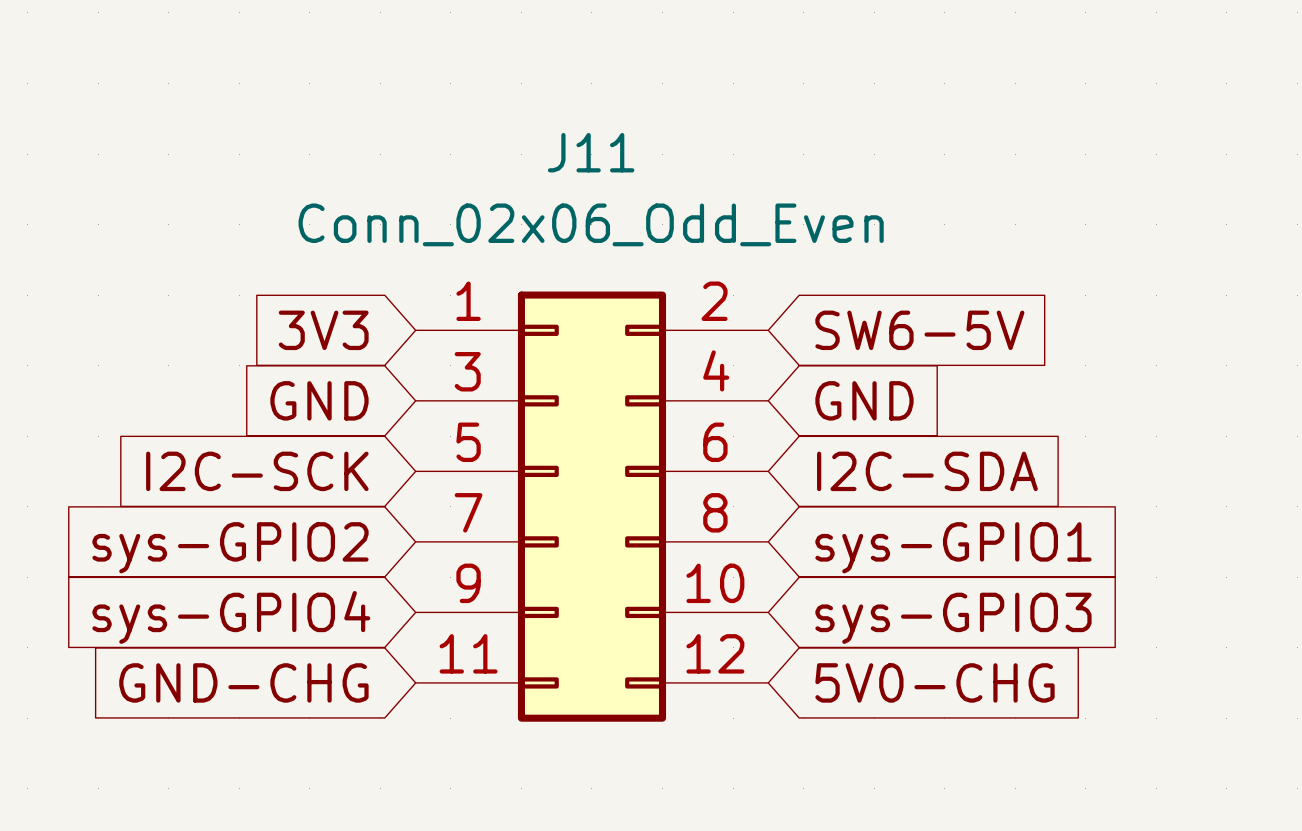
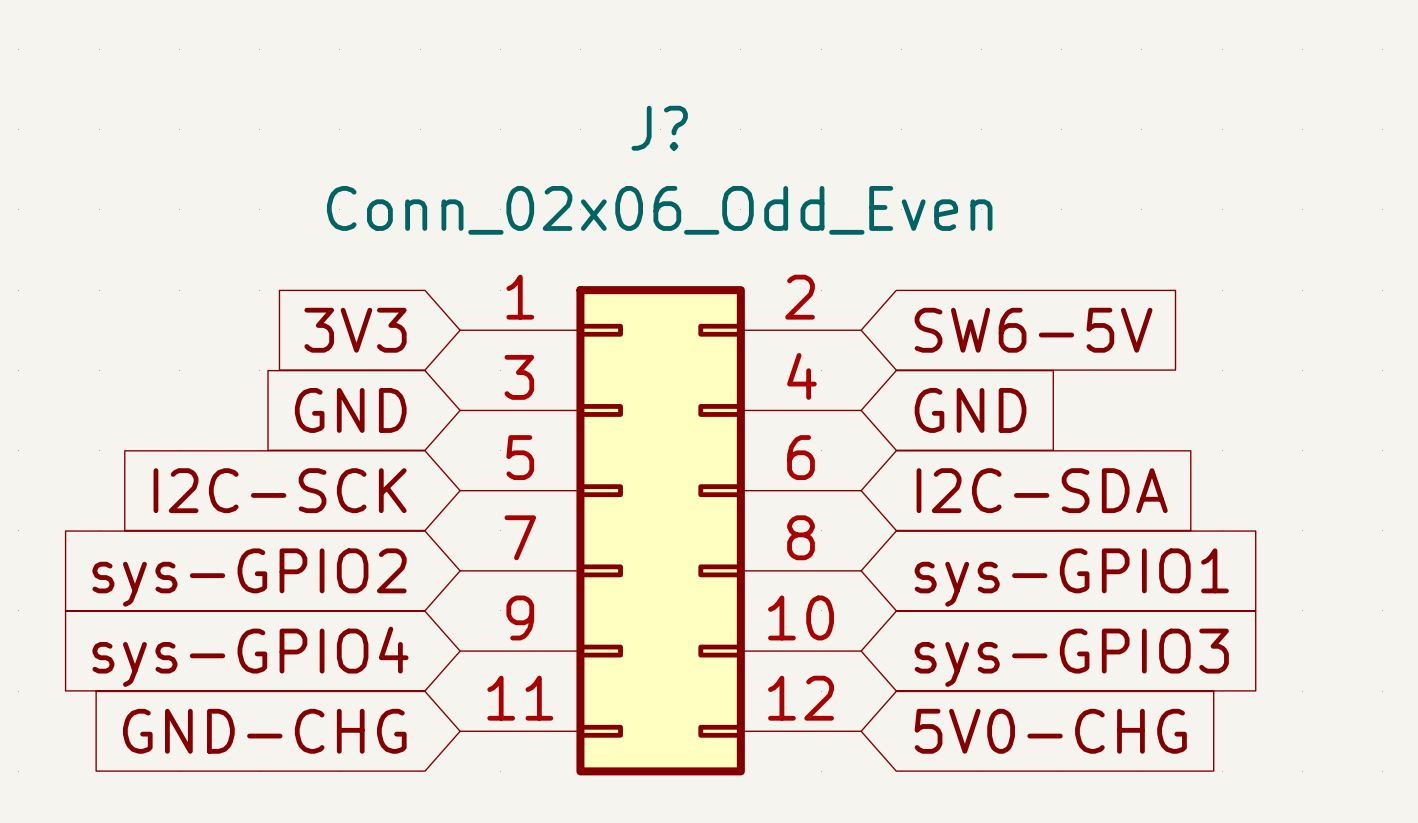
J11 name: J11 (591, 152) -> J? (659, 128)

